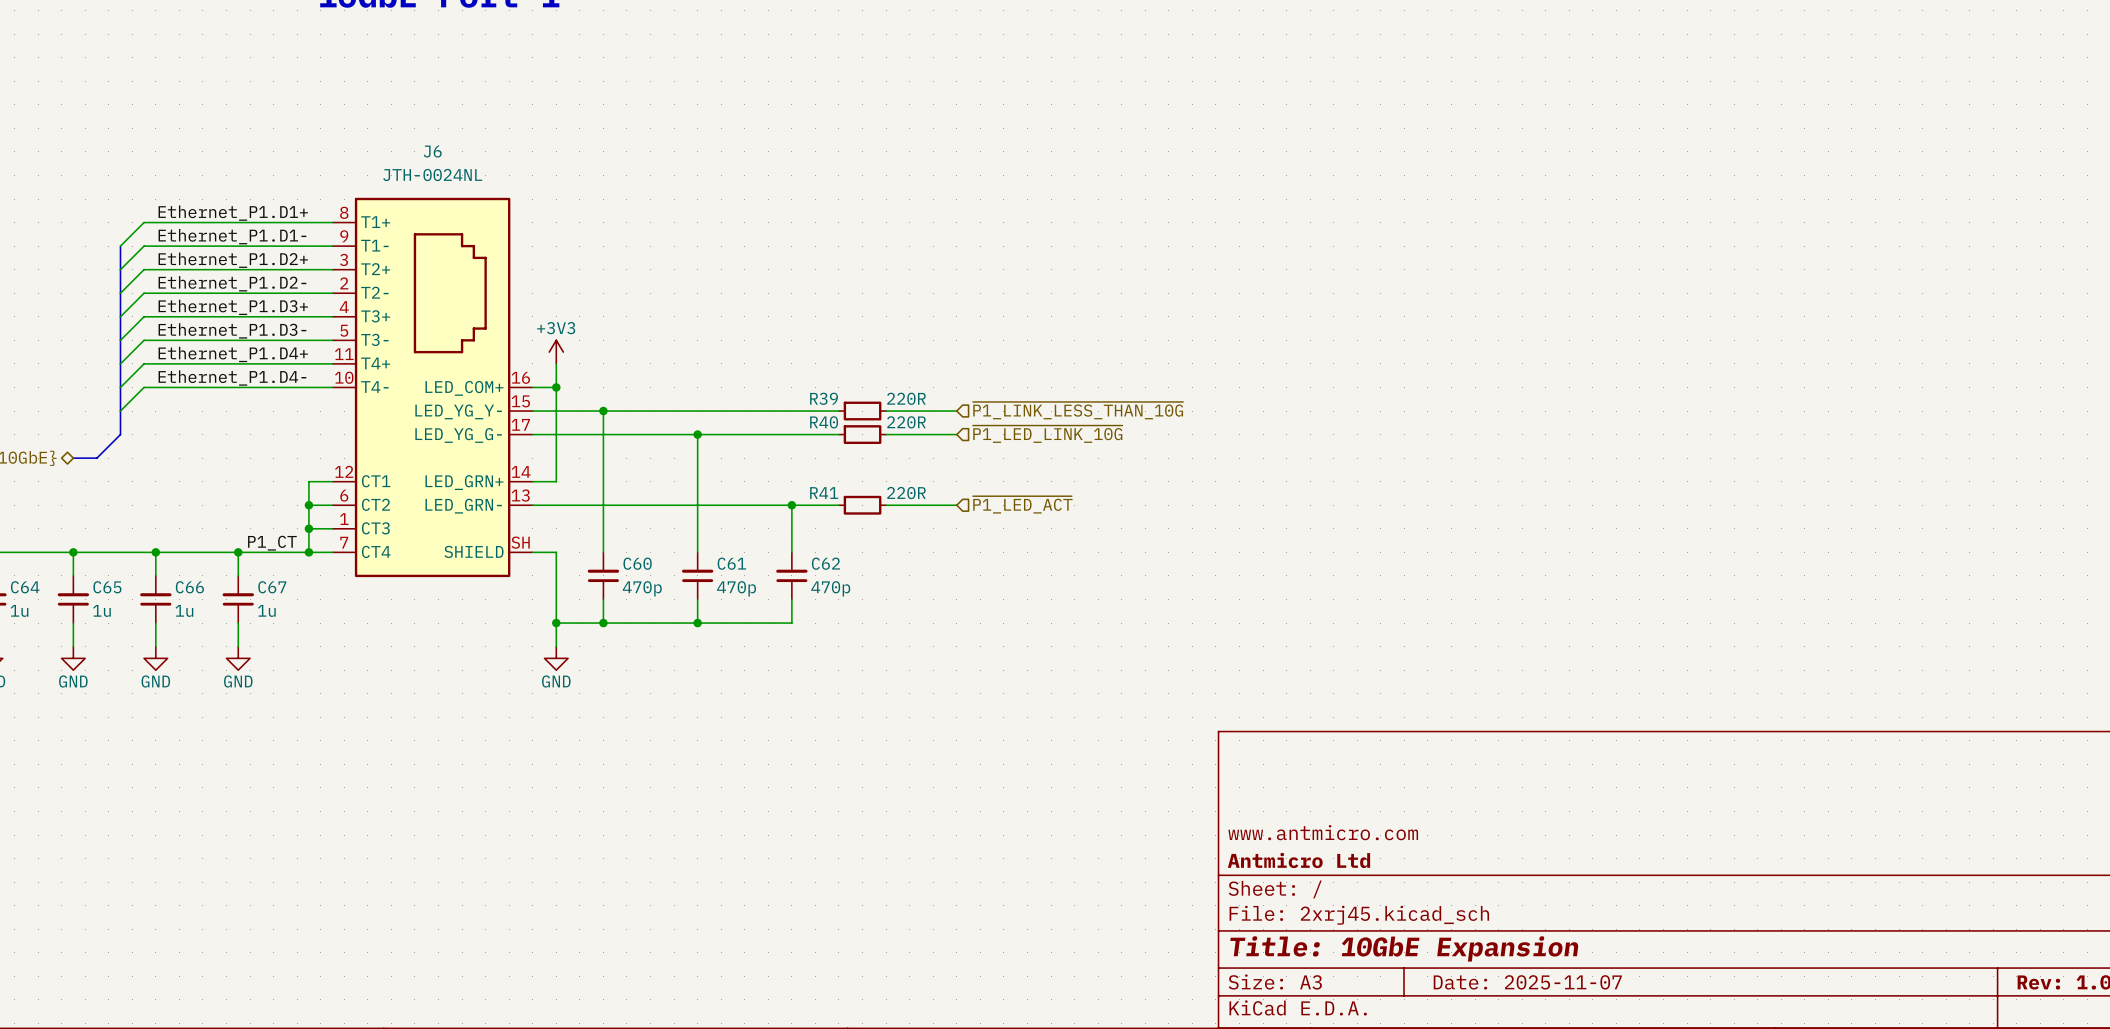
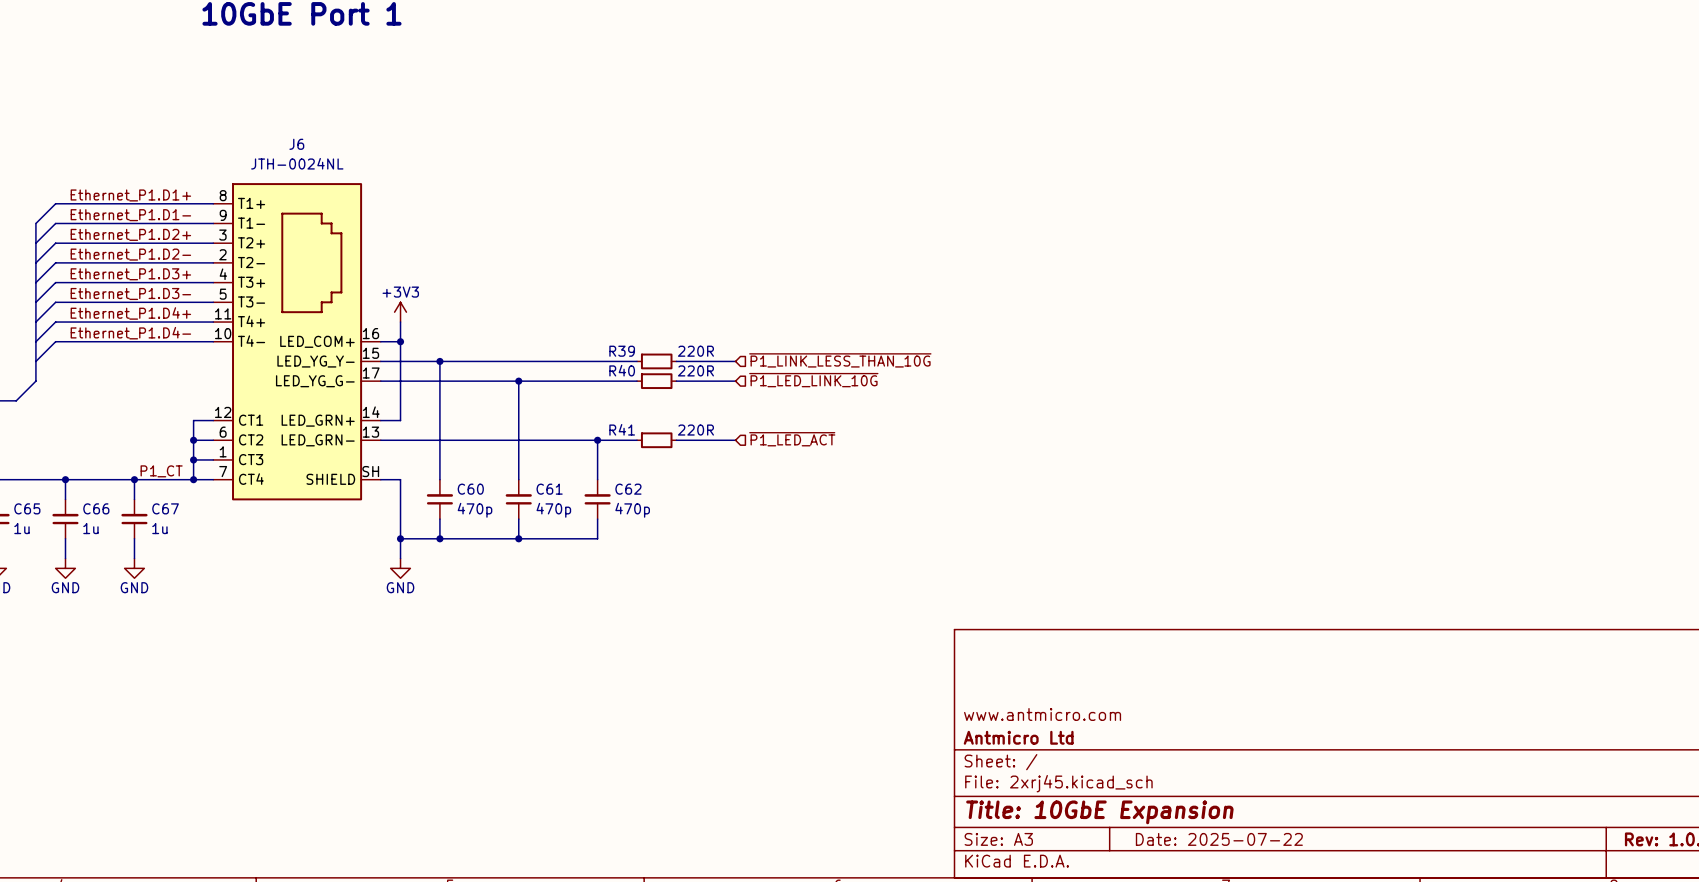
title block: Date: 2025-11-07 (1527, 982) -> Date: 2025-07-22 (1219, 839)

